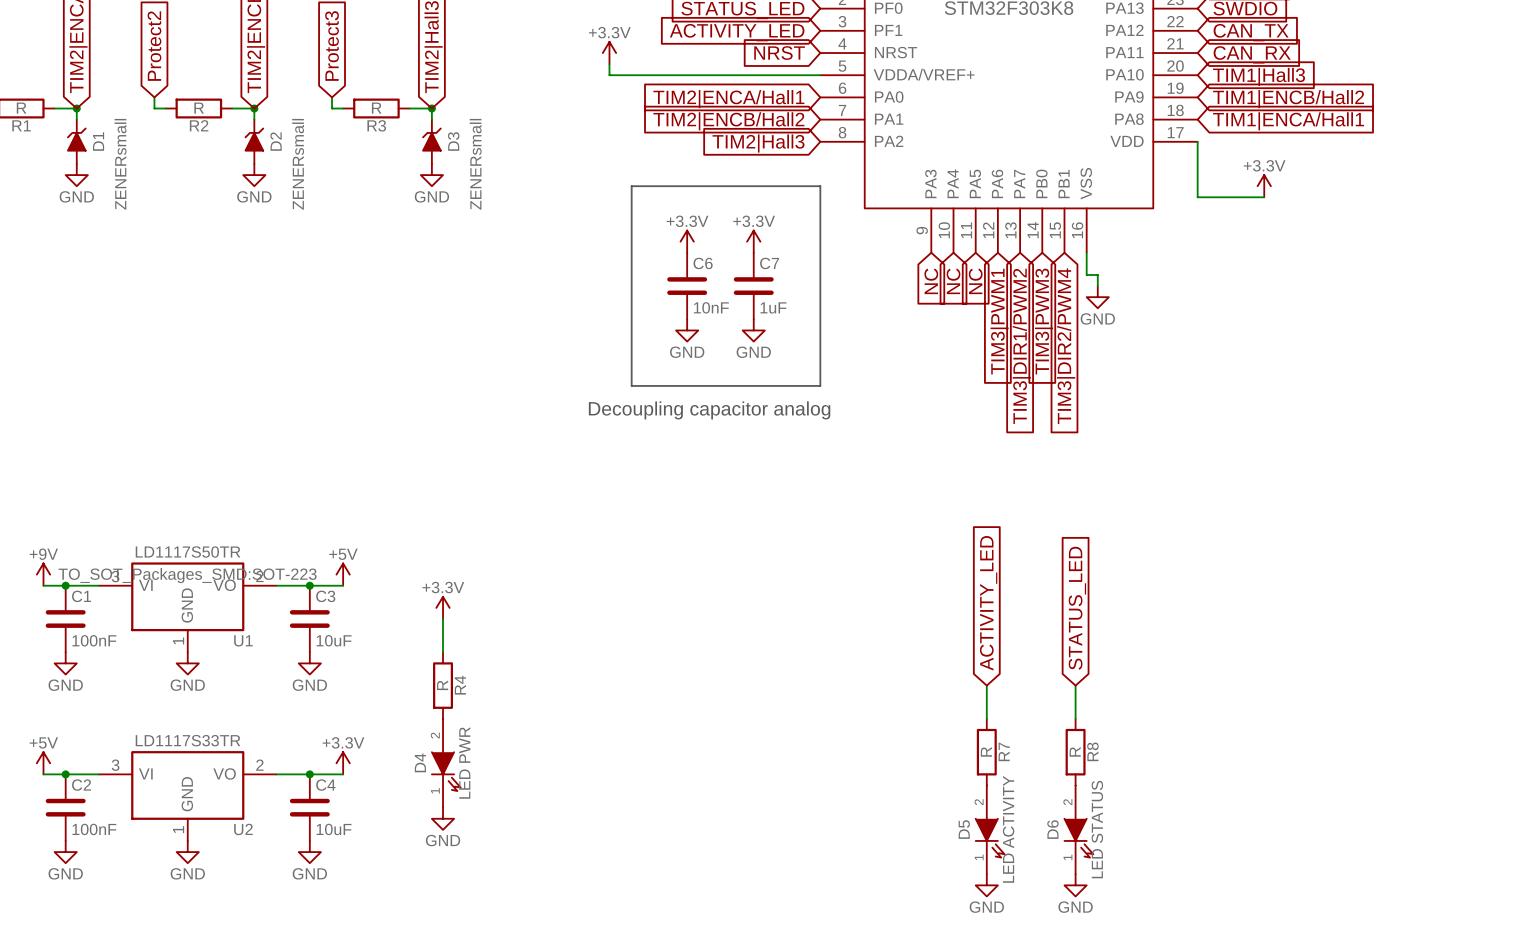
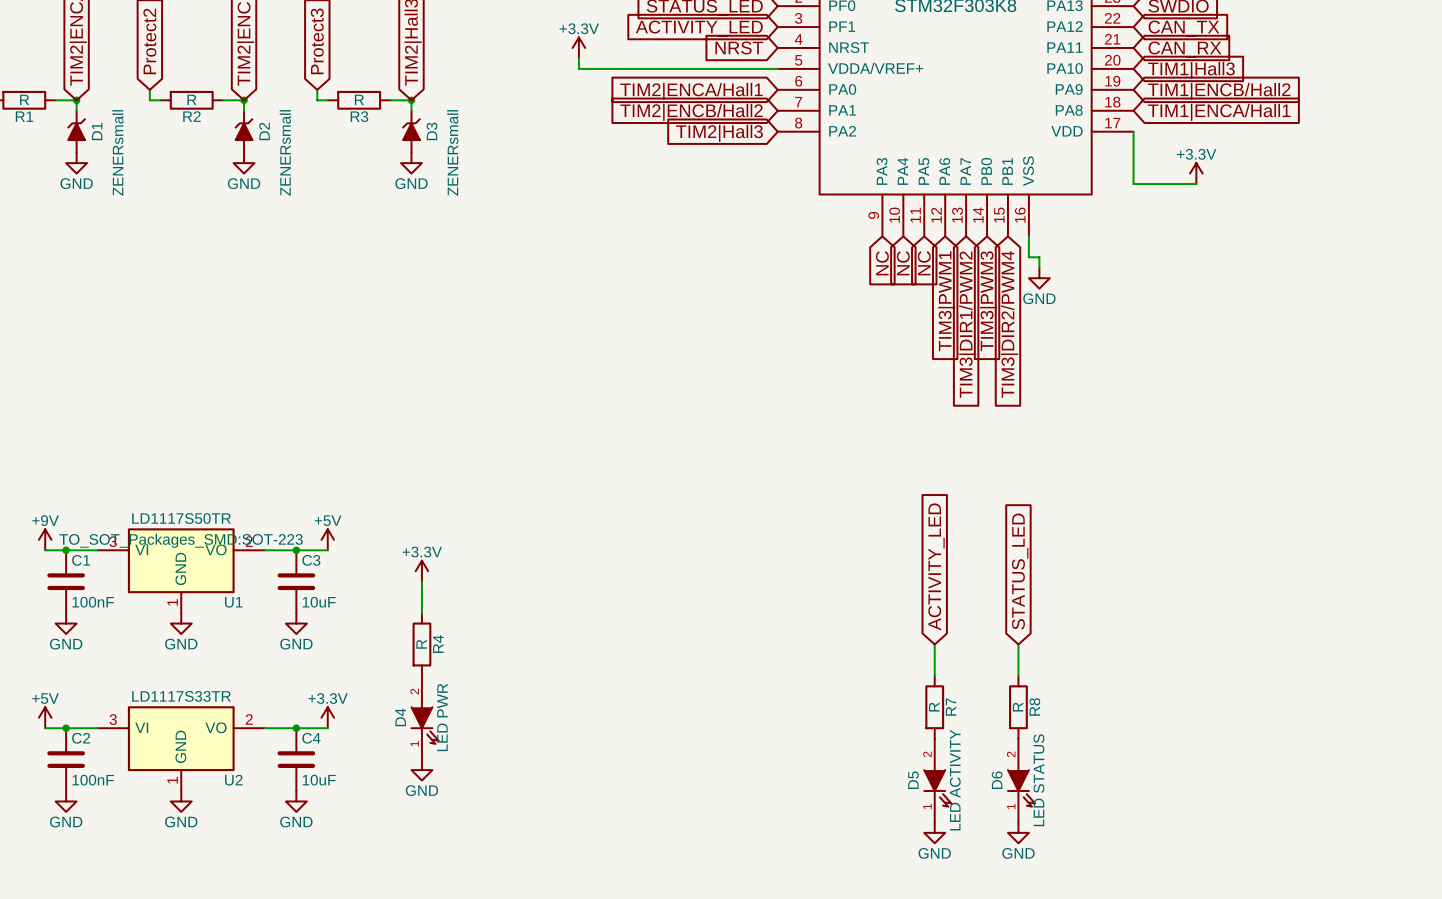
bus: (631, 186) (820, 186) (820, 385) (631, 385) (631, 186) -> none
power symbol: +3.3V (687, 241) -> none
power symbol: +3.3V (753, 241) -> none
C6: 10nF (687, 286) -> none
C7: 1uF (753, 286) -> none
power symbol: GND (687, 330) -> none
power symbol: GND (753, 330) -> none
text: Decoupling capacitor analog (709, 410) -> none

